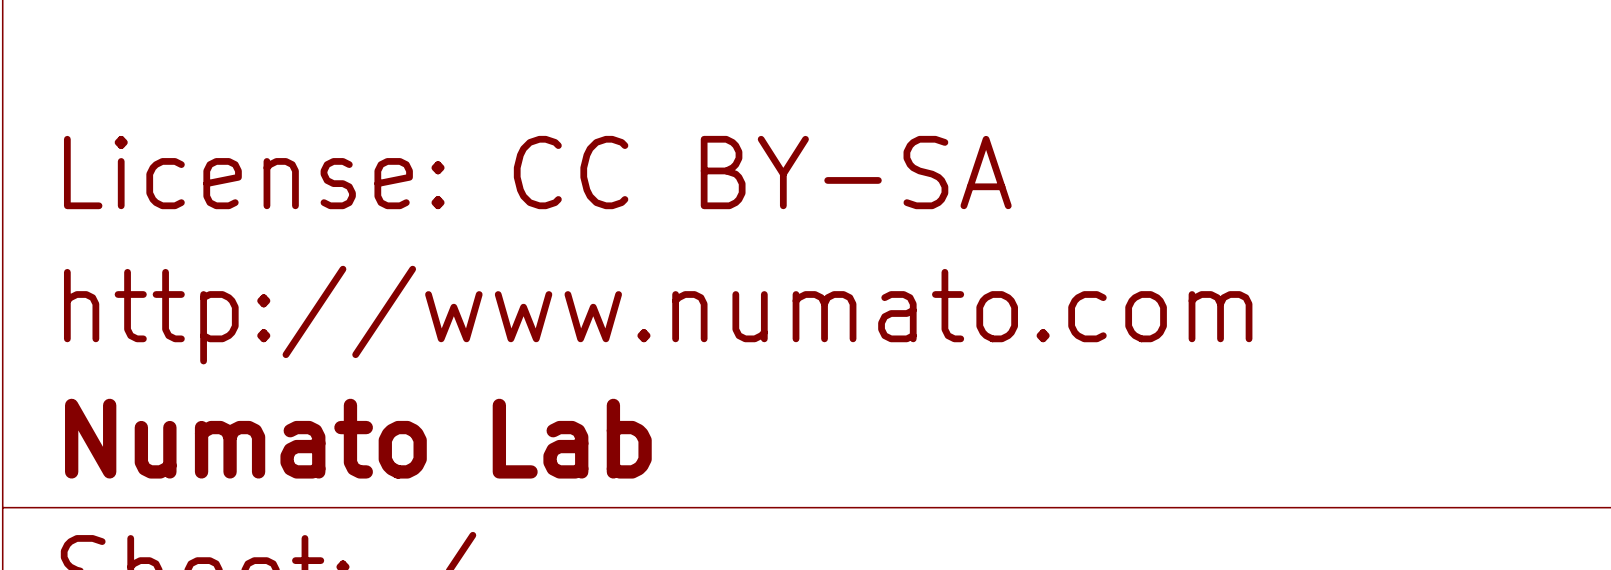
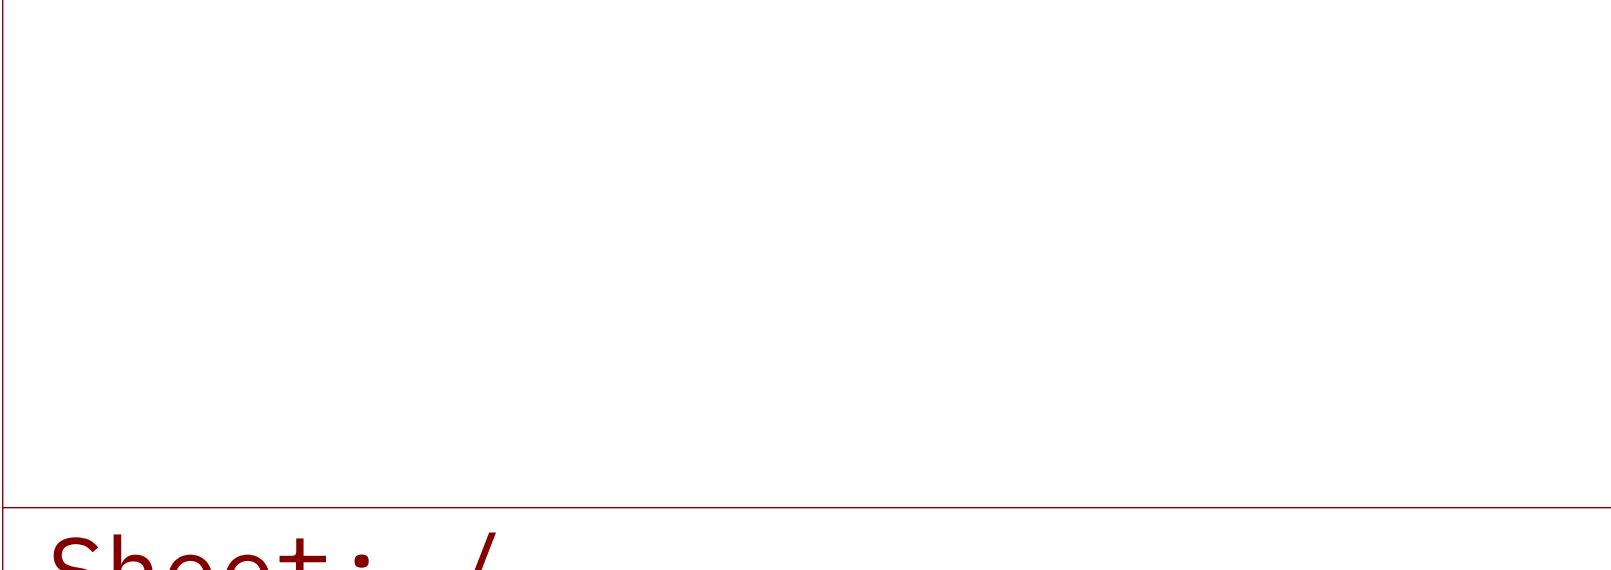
title block: License: CC BY-SA (537, 172) -> none
title block: http://www.numato.com (658, 315) -> none
title block: Numato Lab (358, 438) -> none

